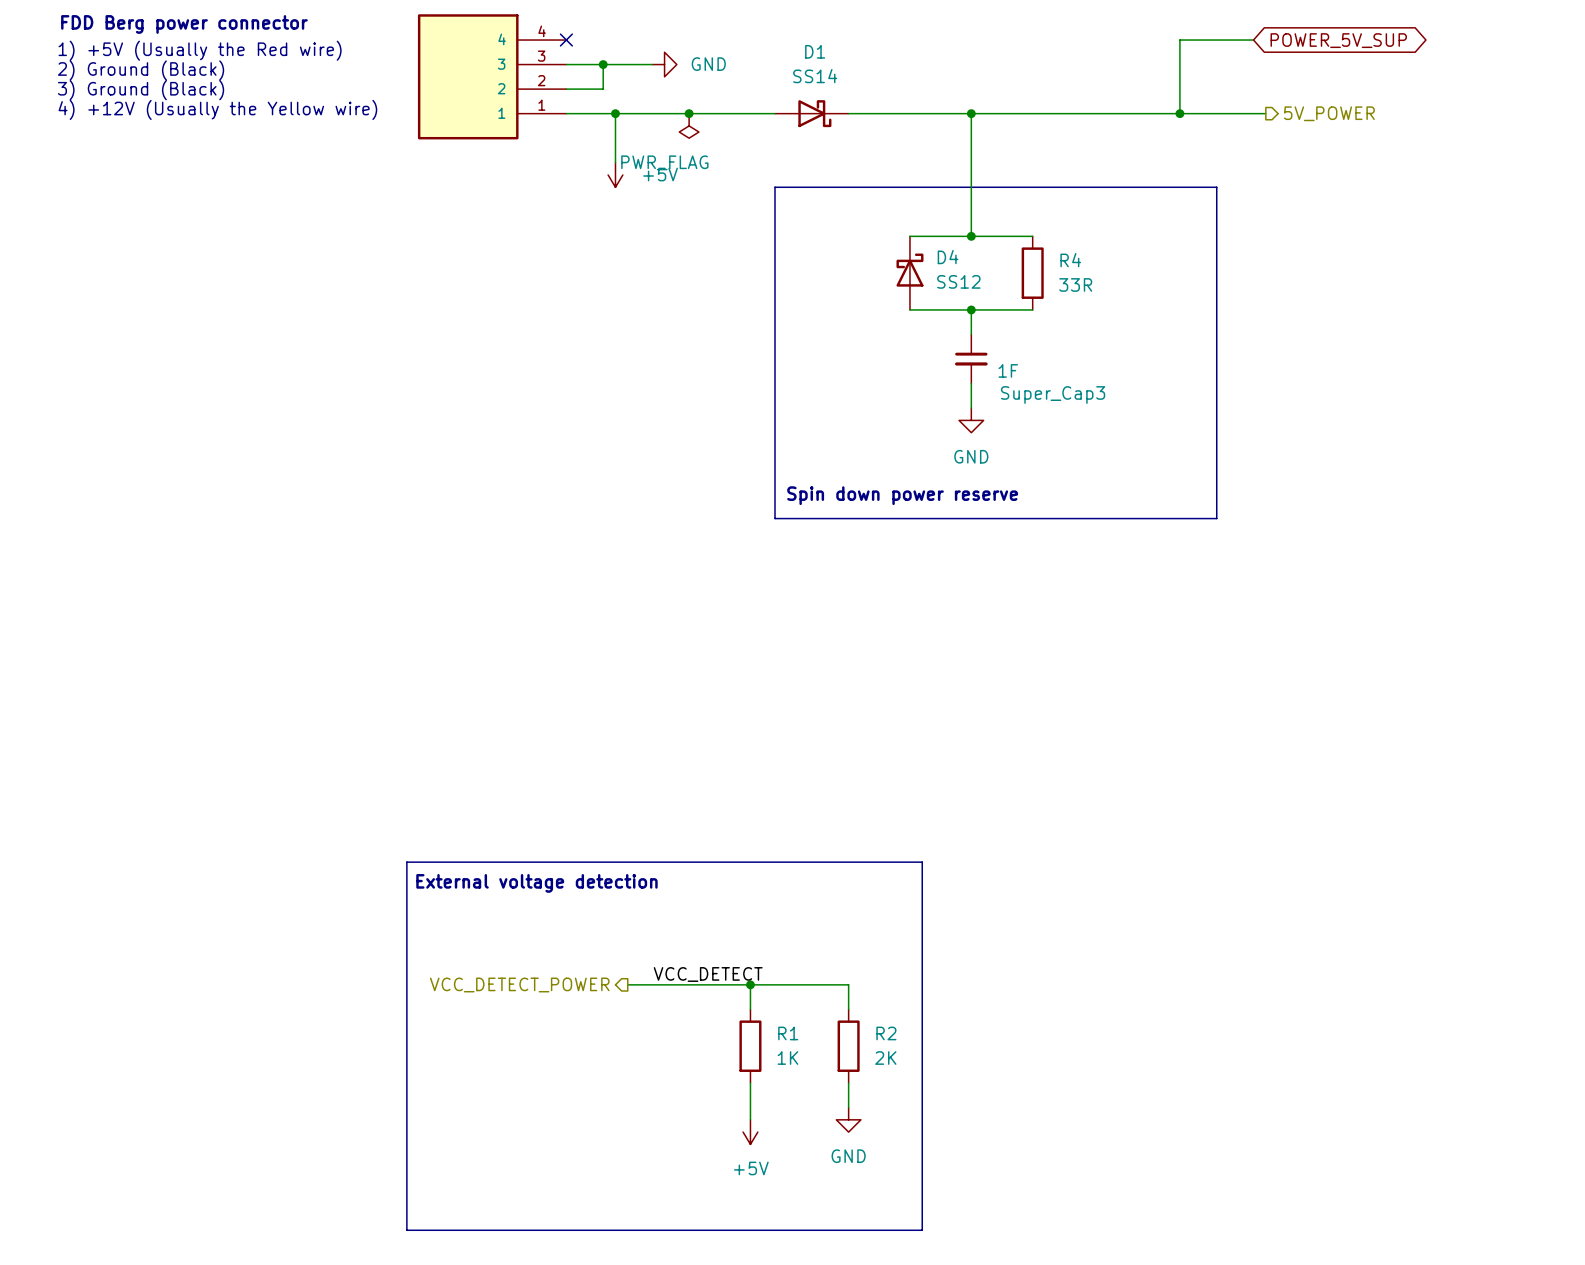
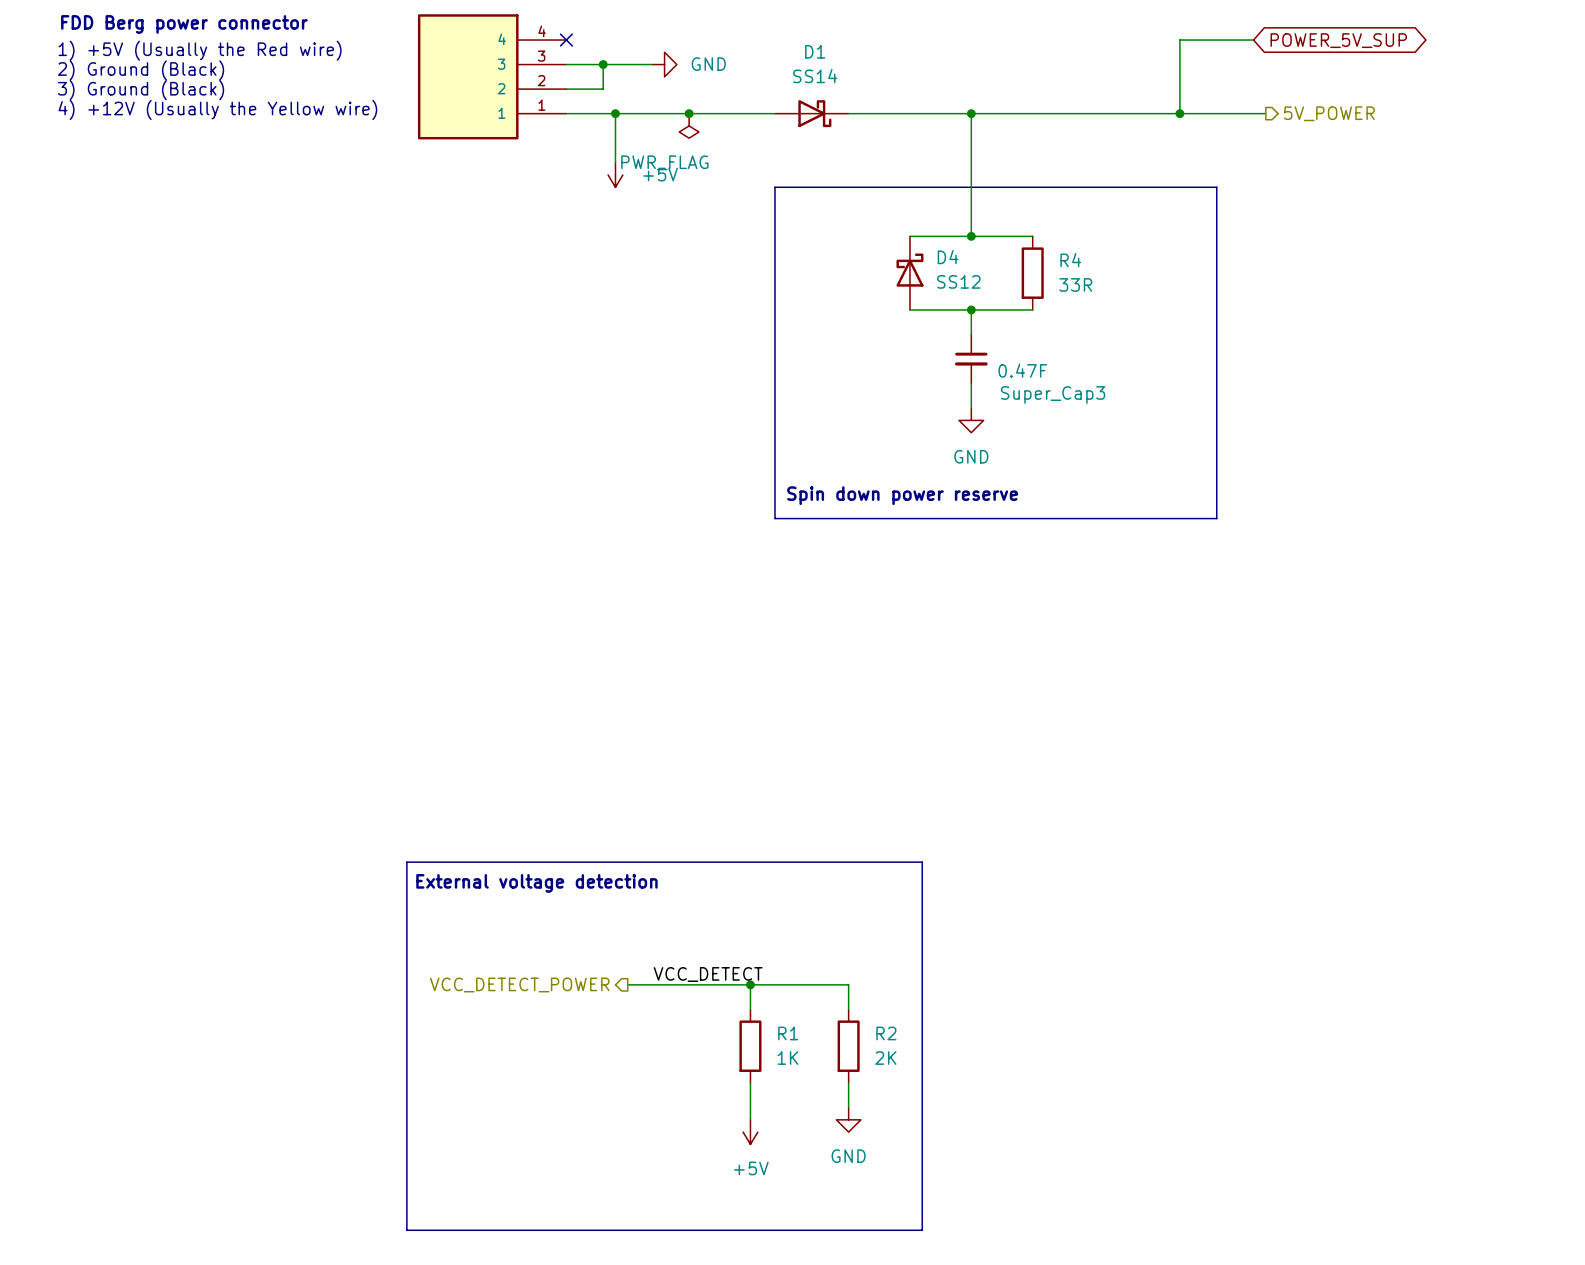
Super_Cap3 value: 1F (1008, 370) -> 0.47F (1022, 370)

